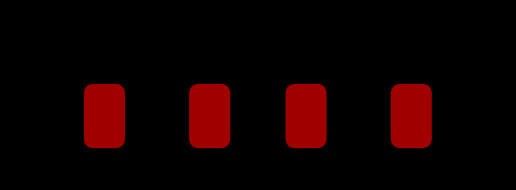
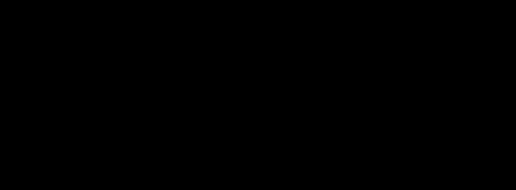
part: (157, 116) -> none
part: (358, 116) -> none

